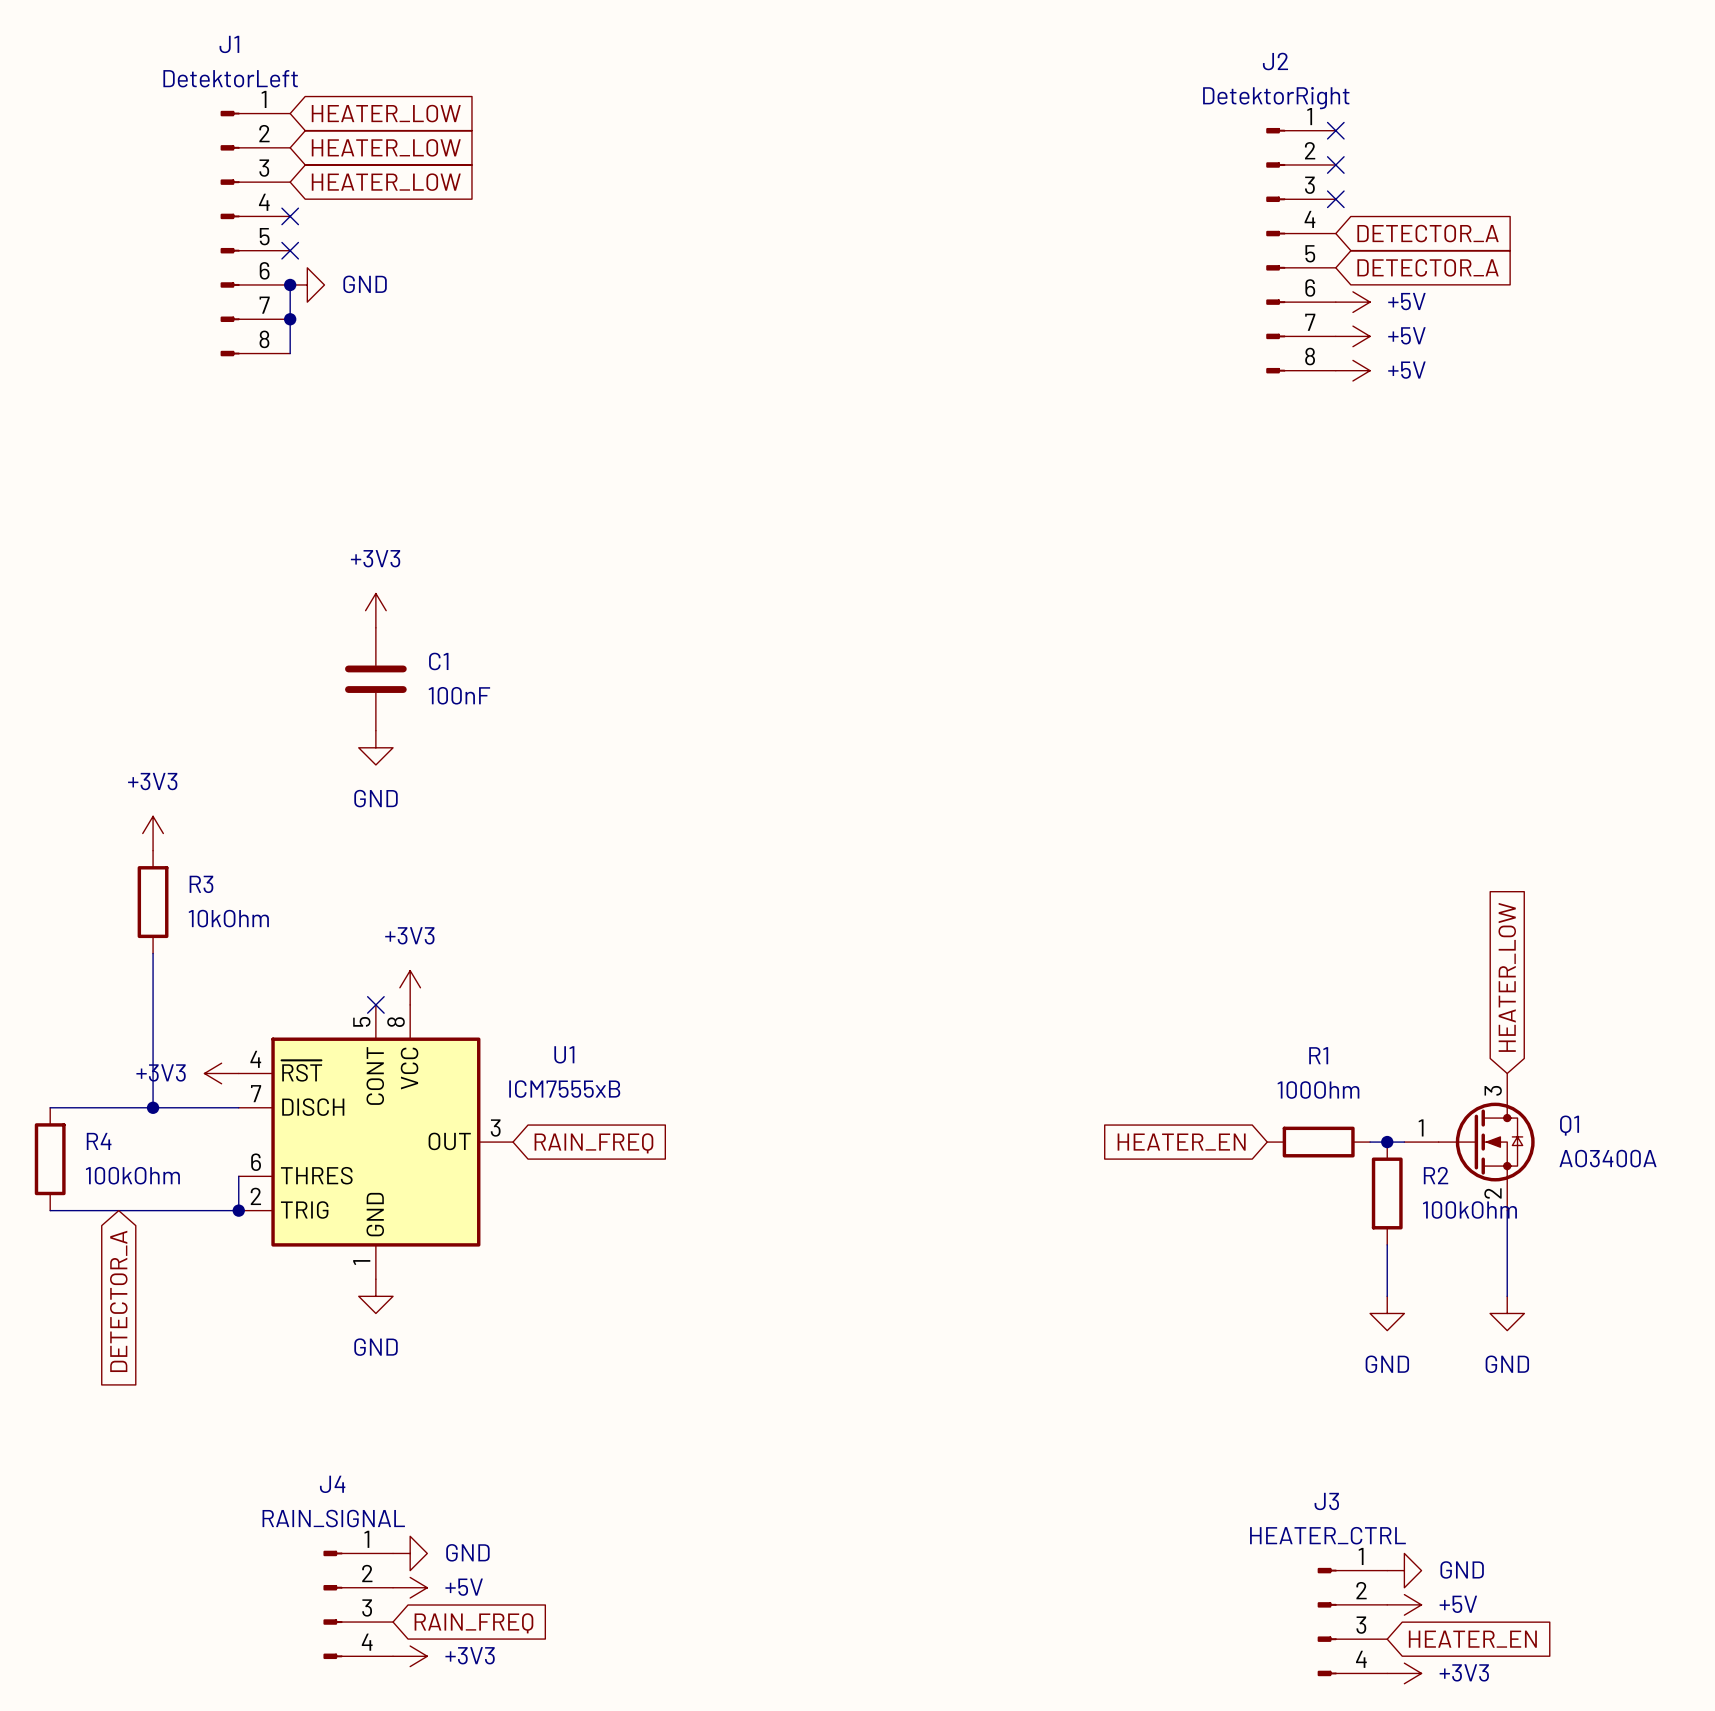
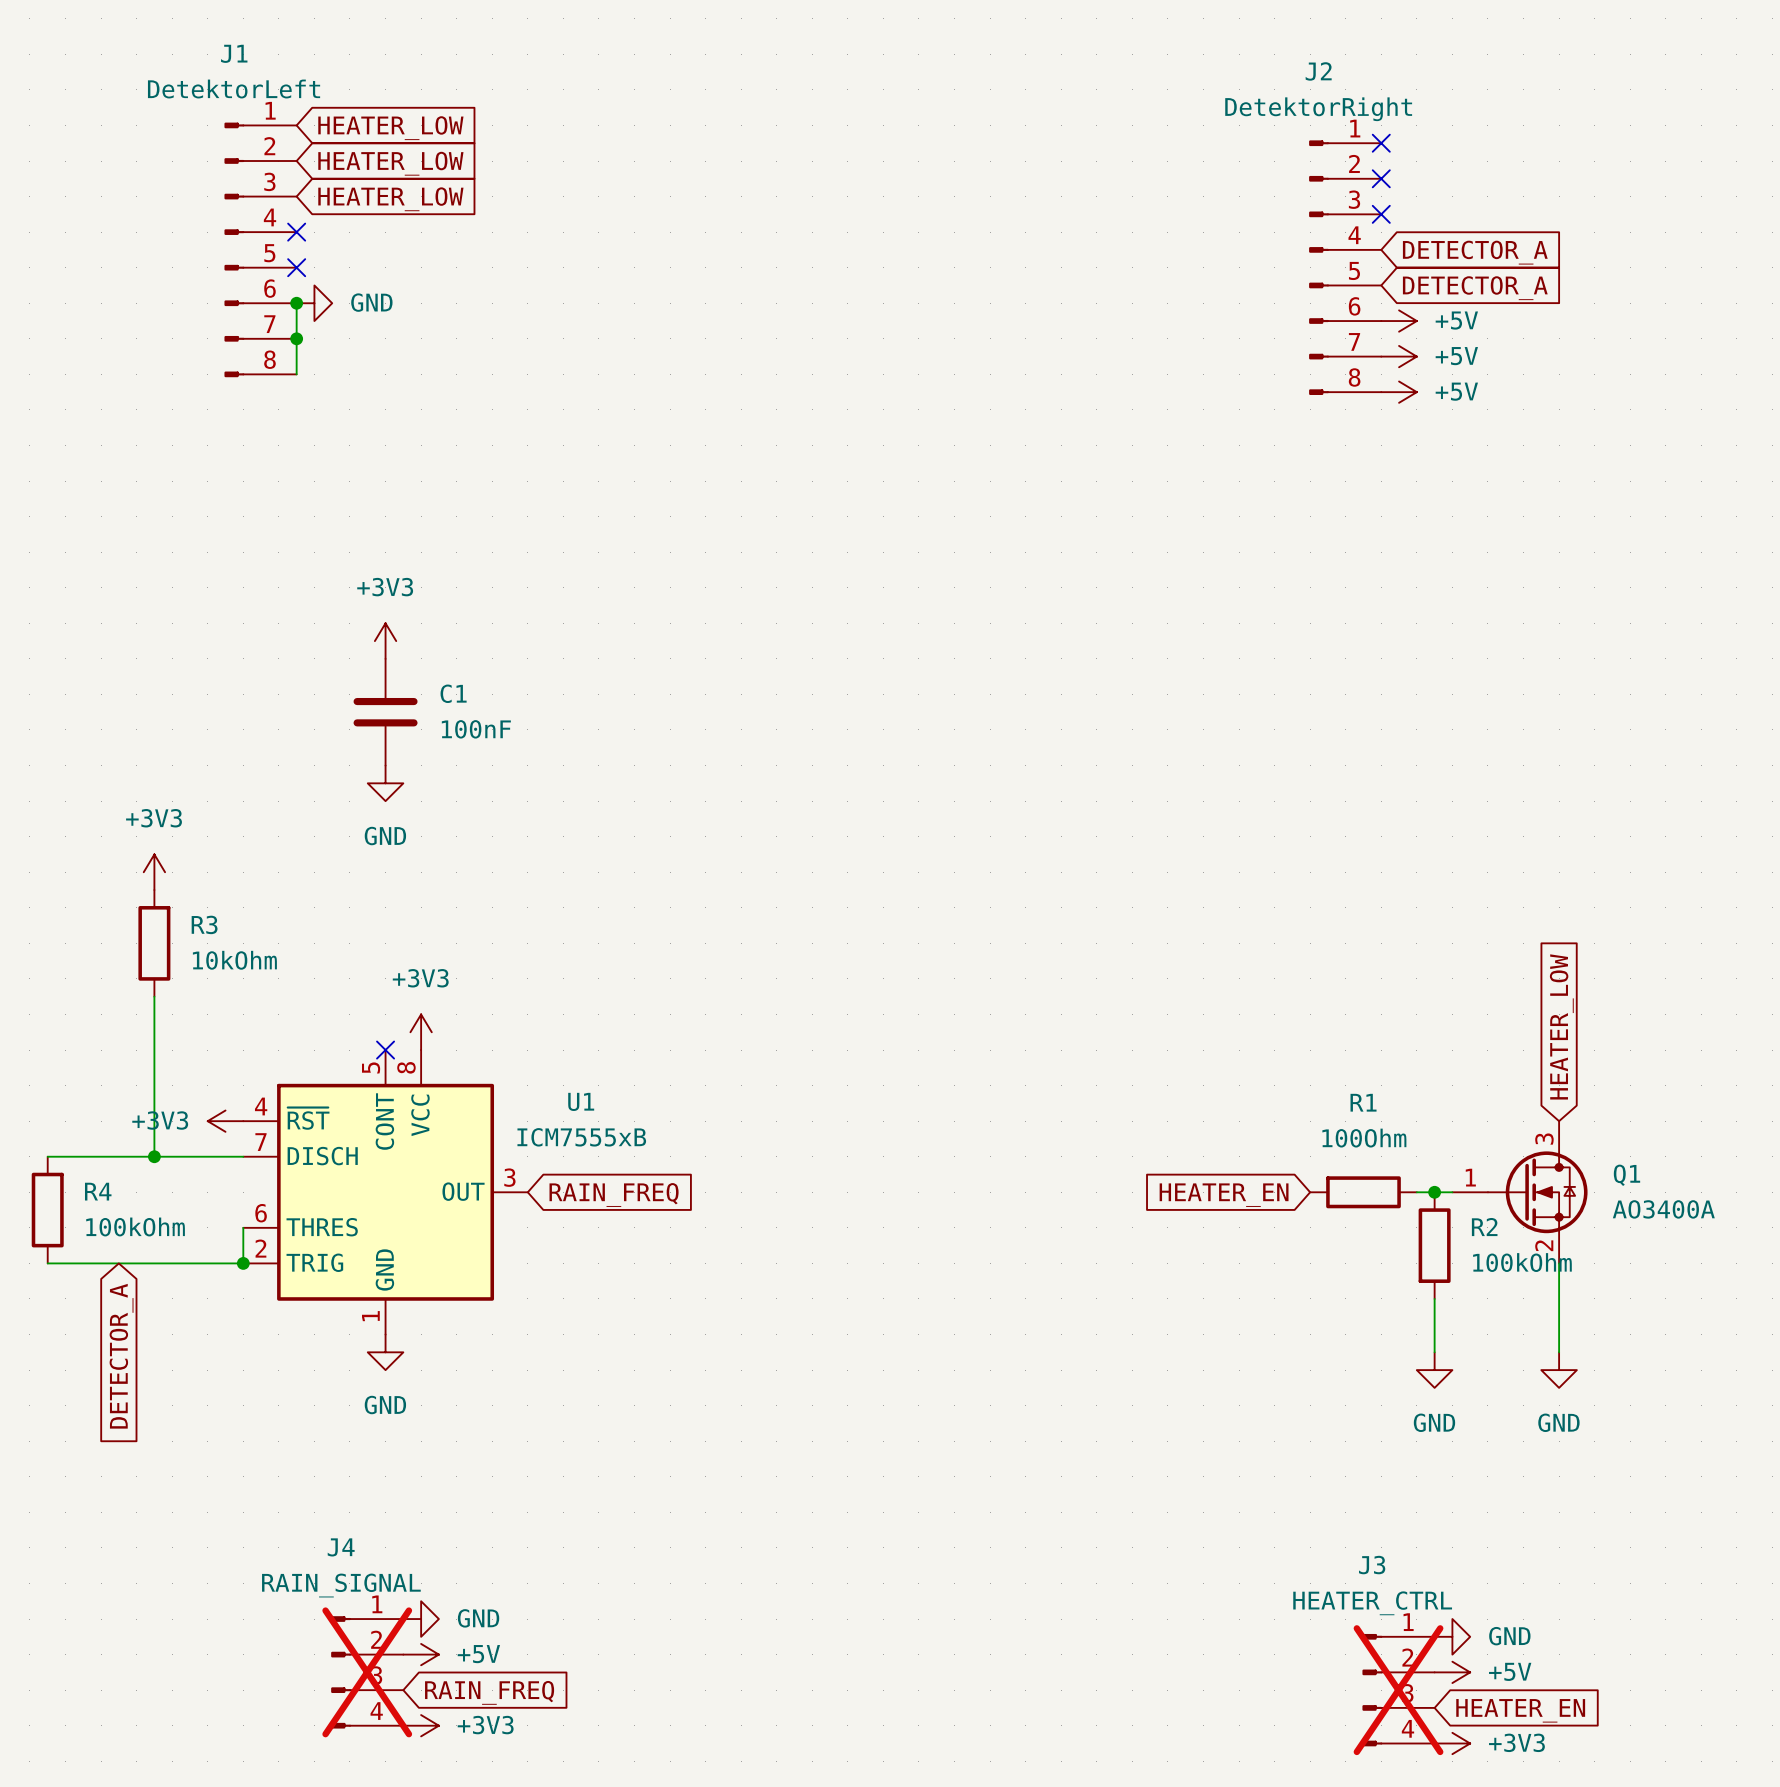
J4 do-not-place cross: none -> (367, 1672)
J3 do-not-place cross: none -> (1398, 1690)

